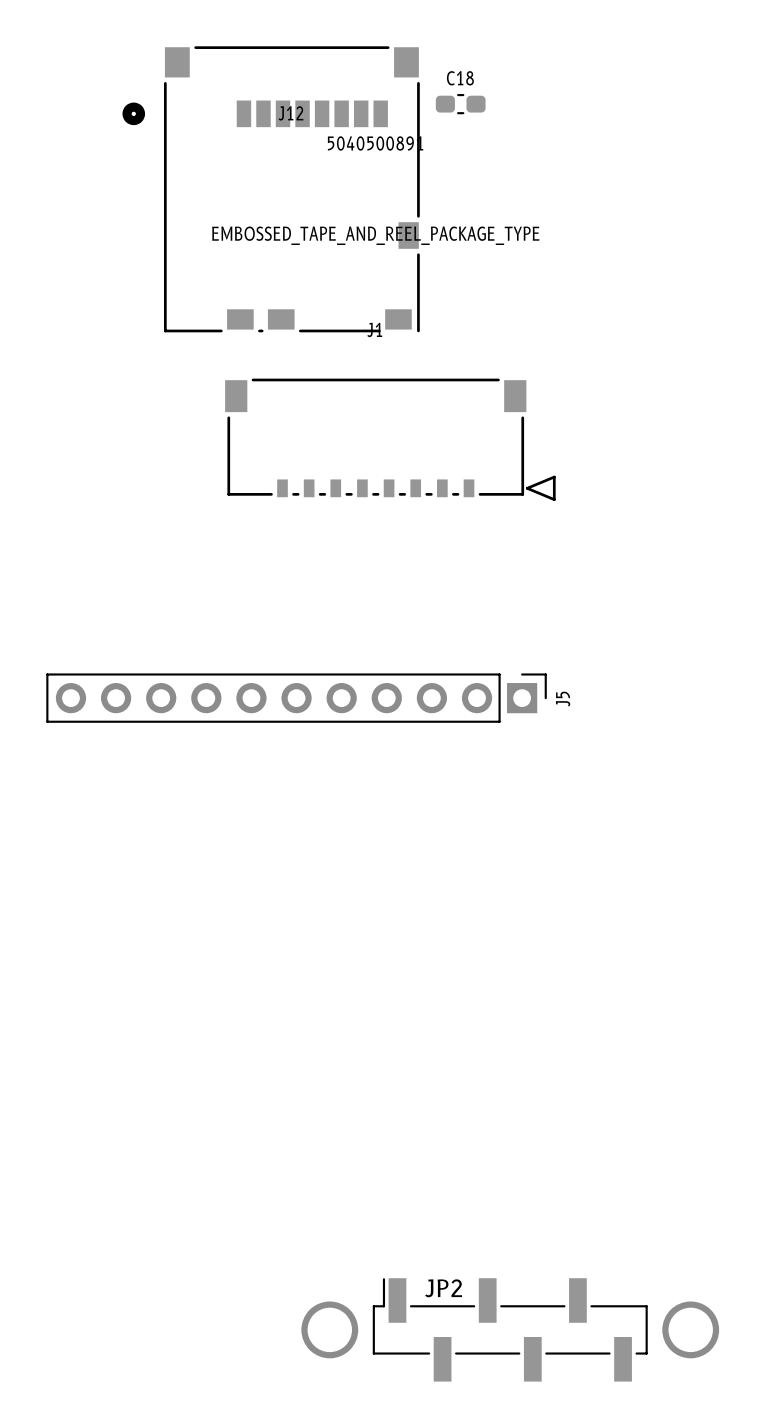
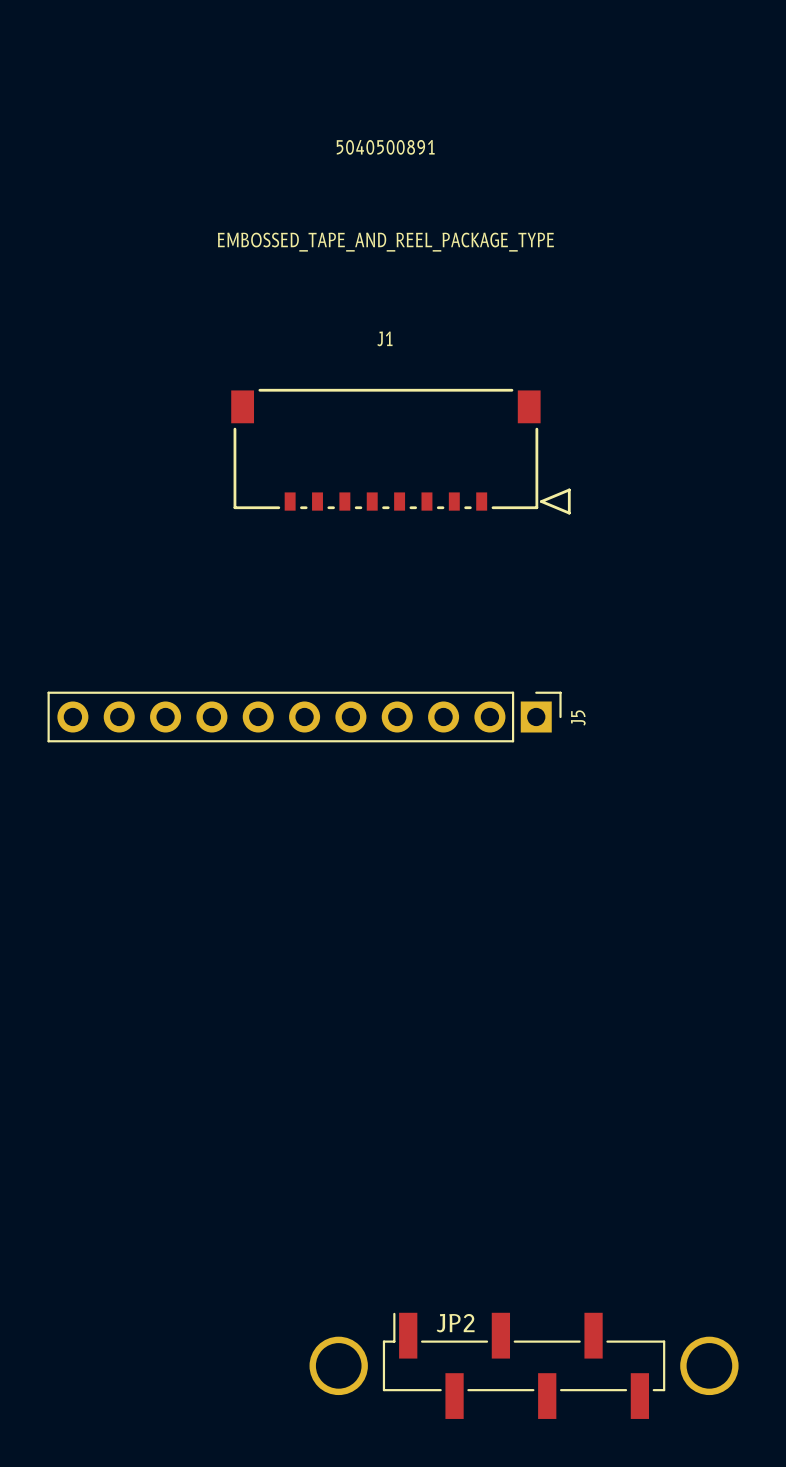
C18: (460, 104) -> none
J12: (271, 189) -> none

